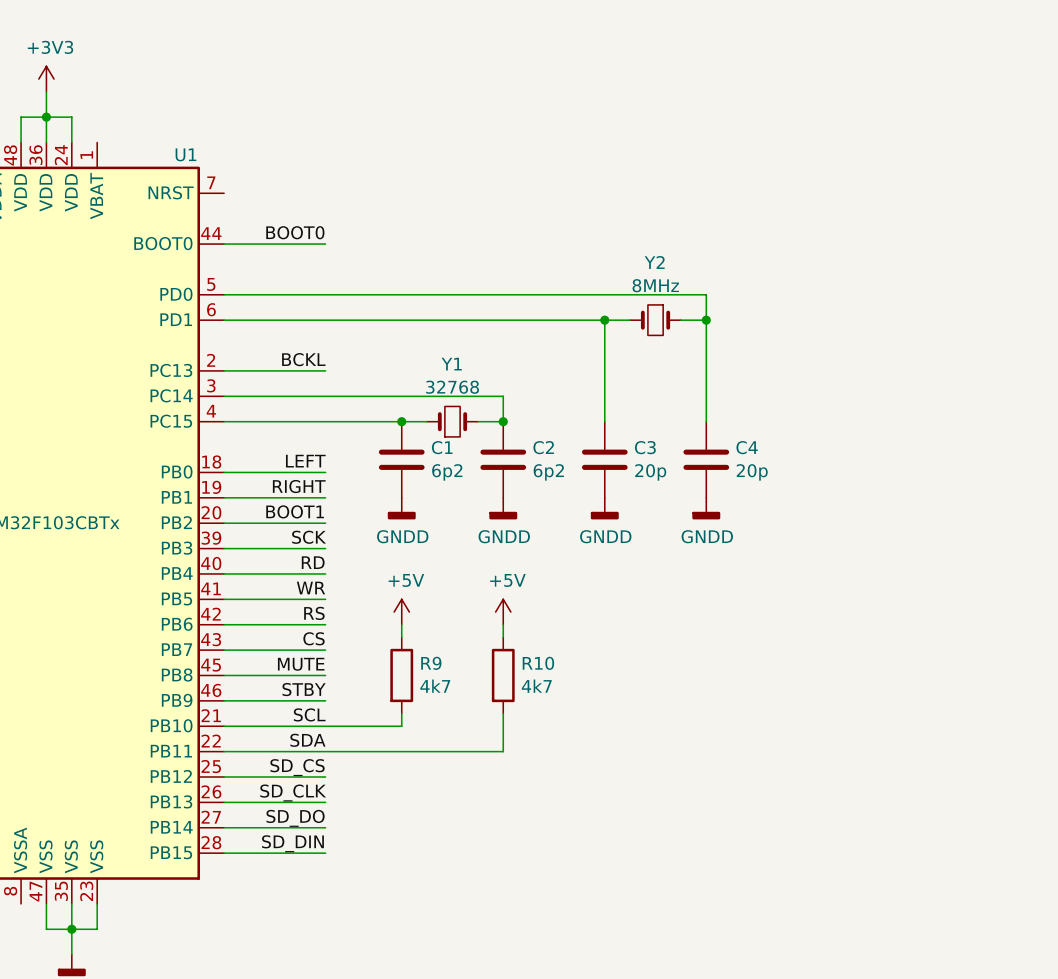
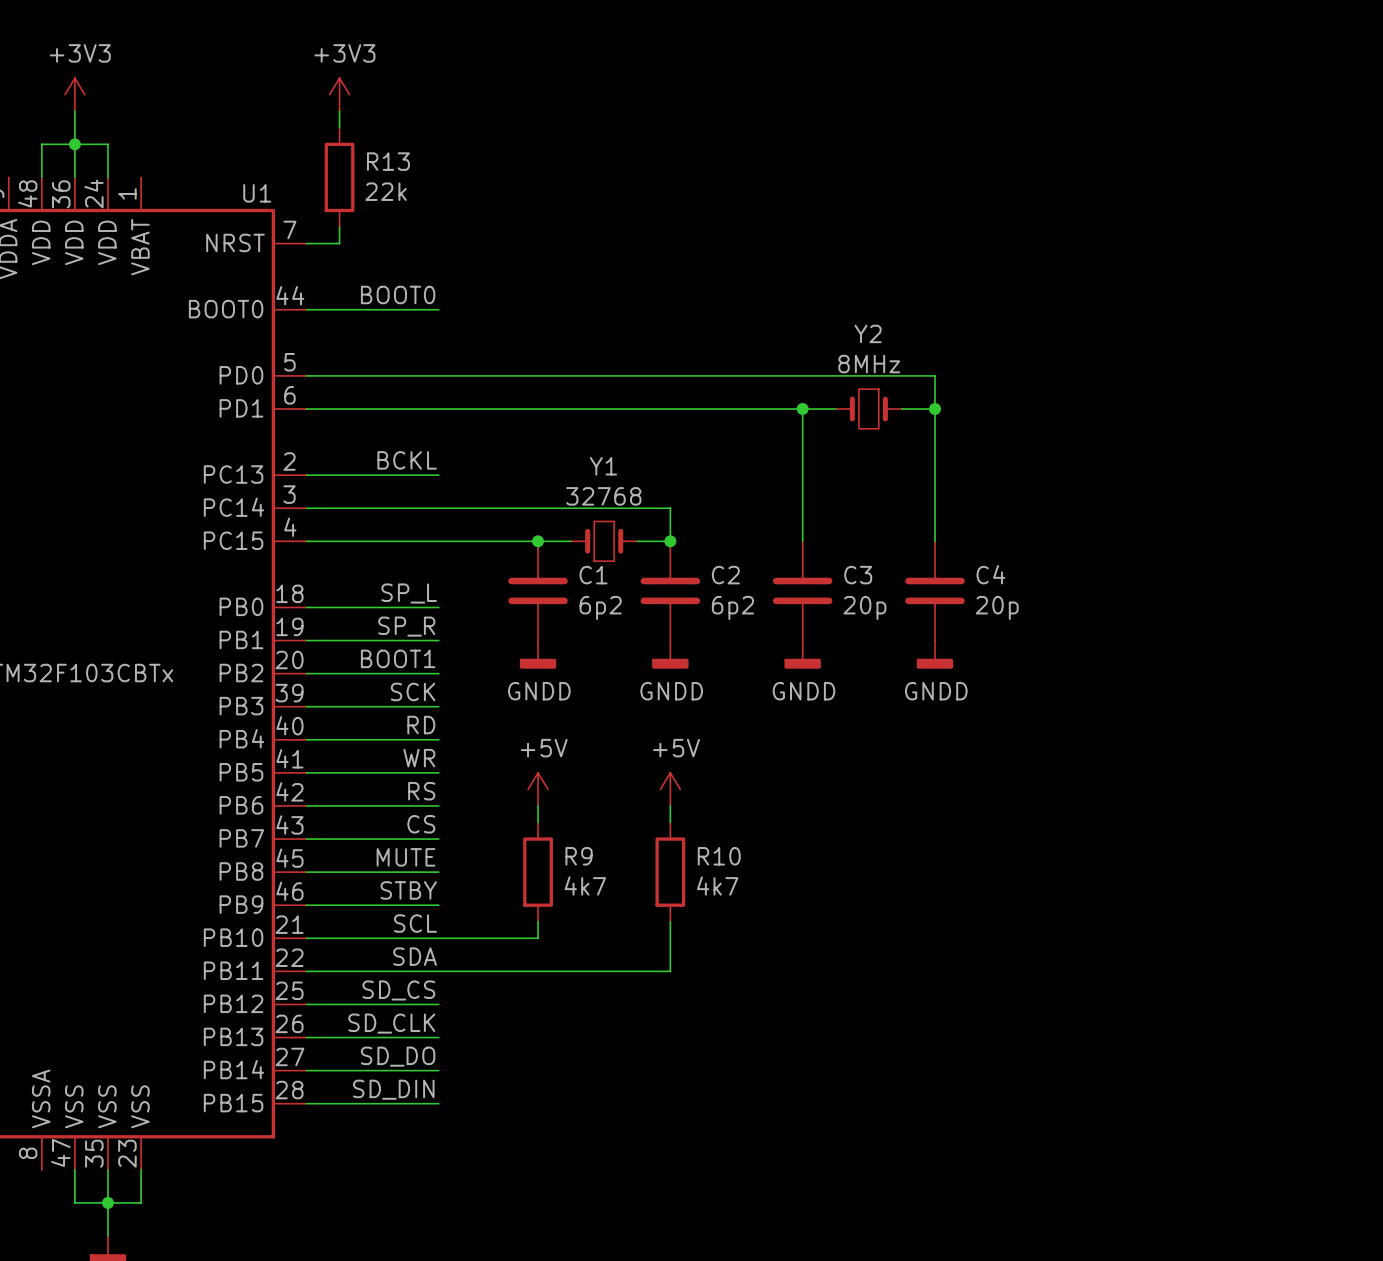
power symbol: none -> +3V3 (339, 94)
wire: none -> (339, 111) (339, 127)
R13: none -> 22k (339, 177)
wire: none -> (339, 227) (339, 243) (306, 243)
label: LEFT (305, 461) -> SP_L (409, 593)
label: RIGHT (299, 486) -> SP_R (406, 626)

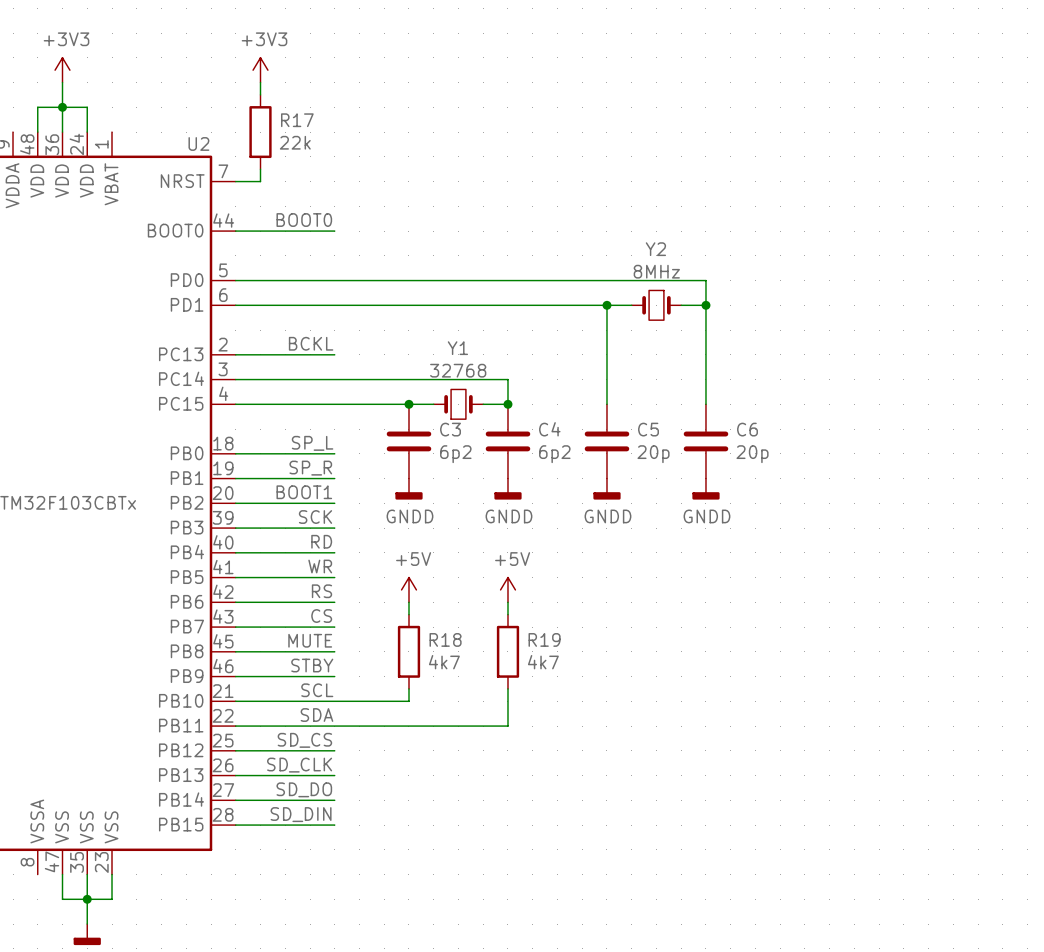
R13 name: R13 (388, 161) -> R17 (297, 120)
U1 name: U1 (257, 193) -> U2 (198, 143)
C4 name: C4 (990, 574) -> C6 (747, 429)
C1 name: C1 (593, 575) -> C3 (450, 429)
C2 name: C2 (725, 575) -> C4 (549, 429)
C3 name: C3 (858, 575) -> C5 (648, 429)
R9 name: R9 (579, 856) -> R18 (445, 639)
R10 name: R10 (719, 856) -> R19 (544, 639)

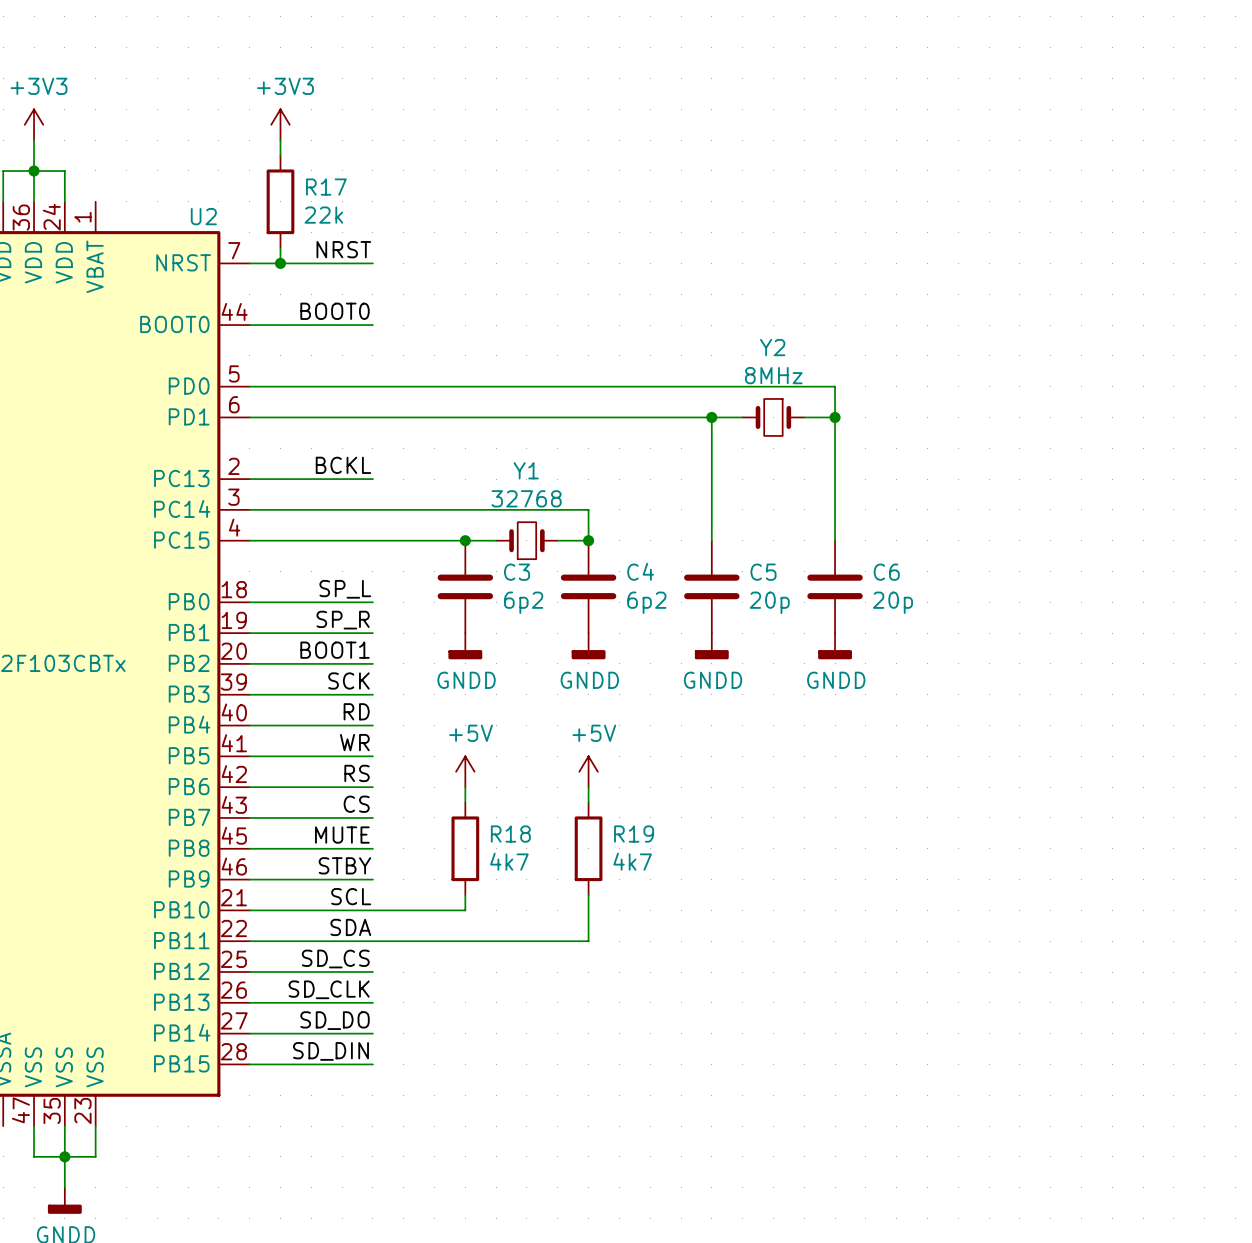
label: none -> NRST (343, 249)
wire: none -> (280, 263) (372, 263)
junction: none -> (280, 263)

